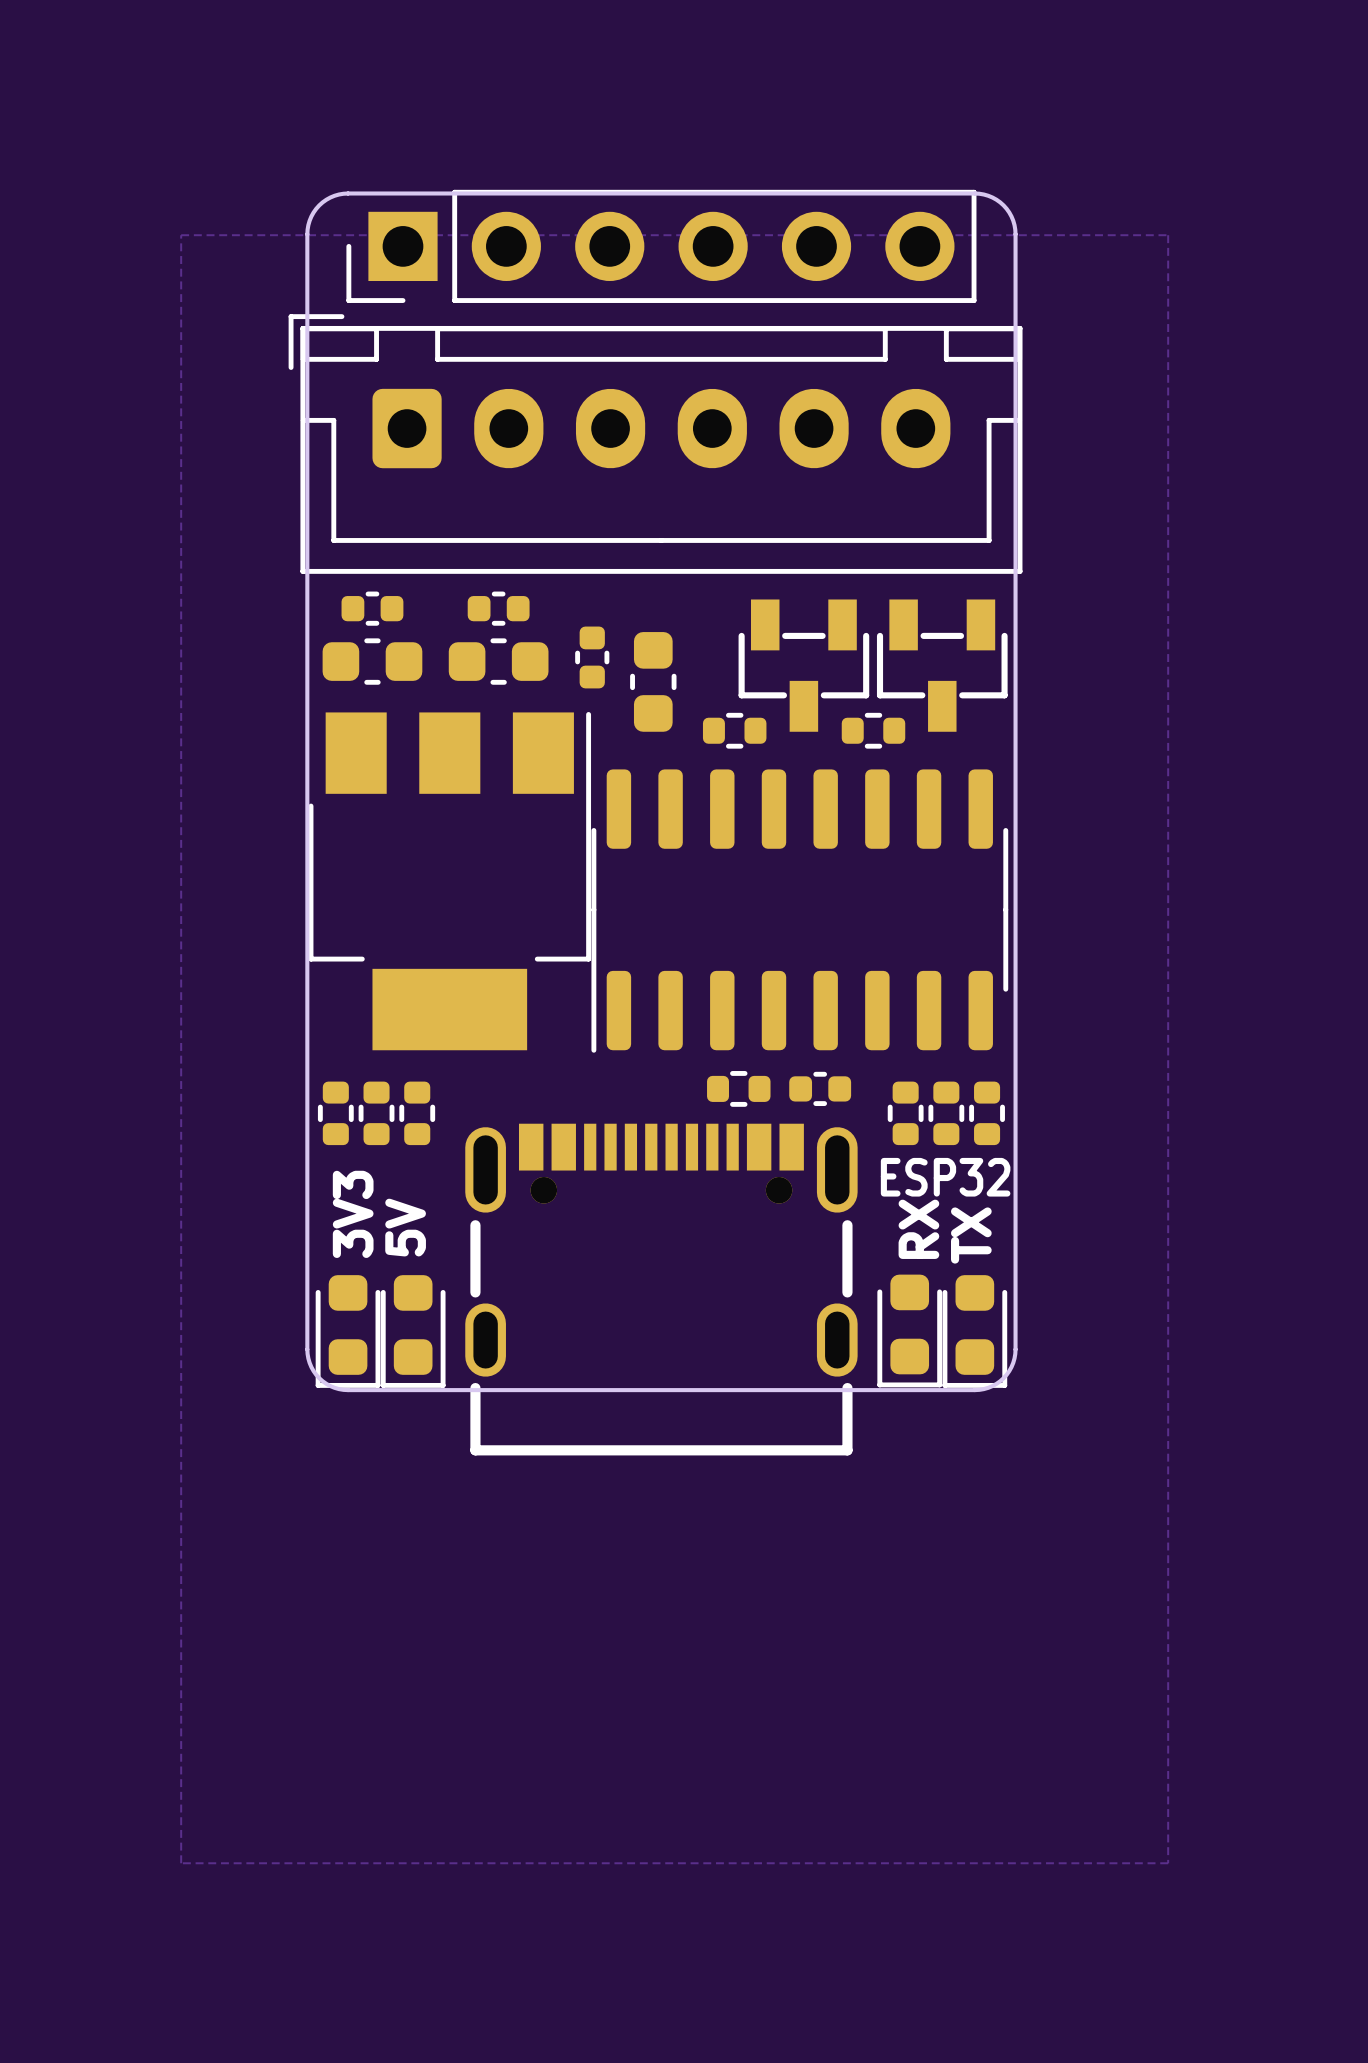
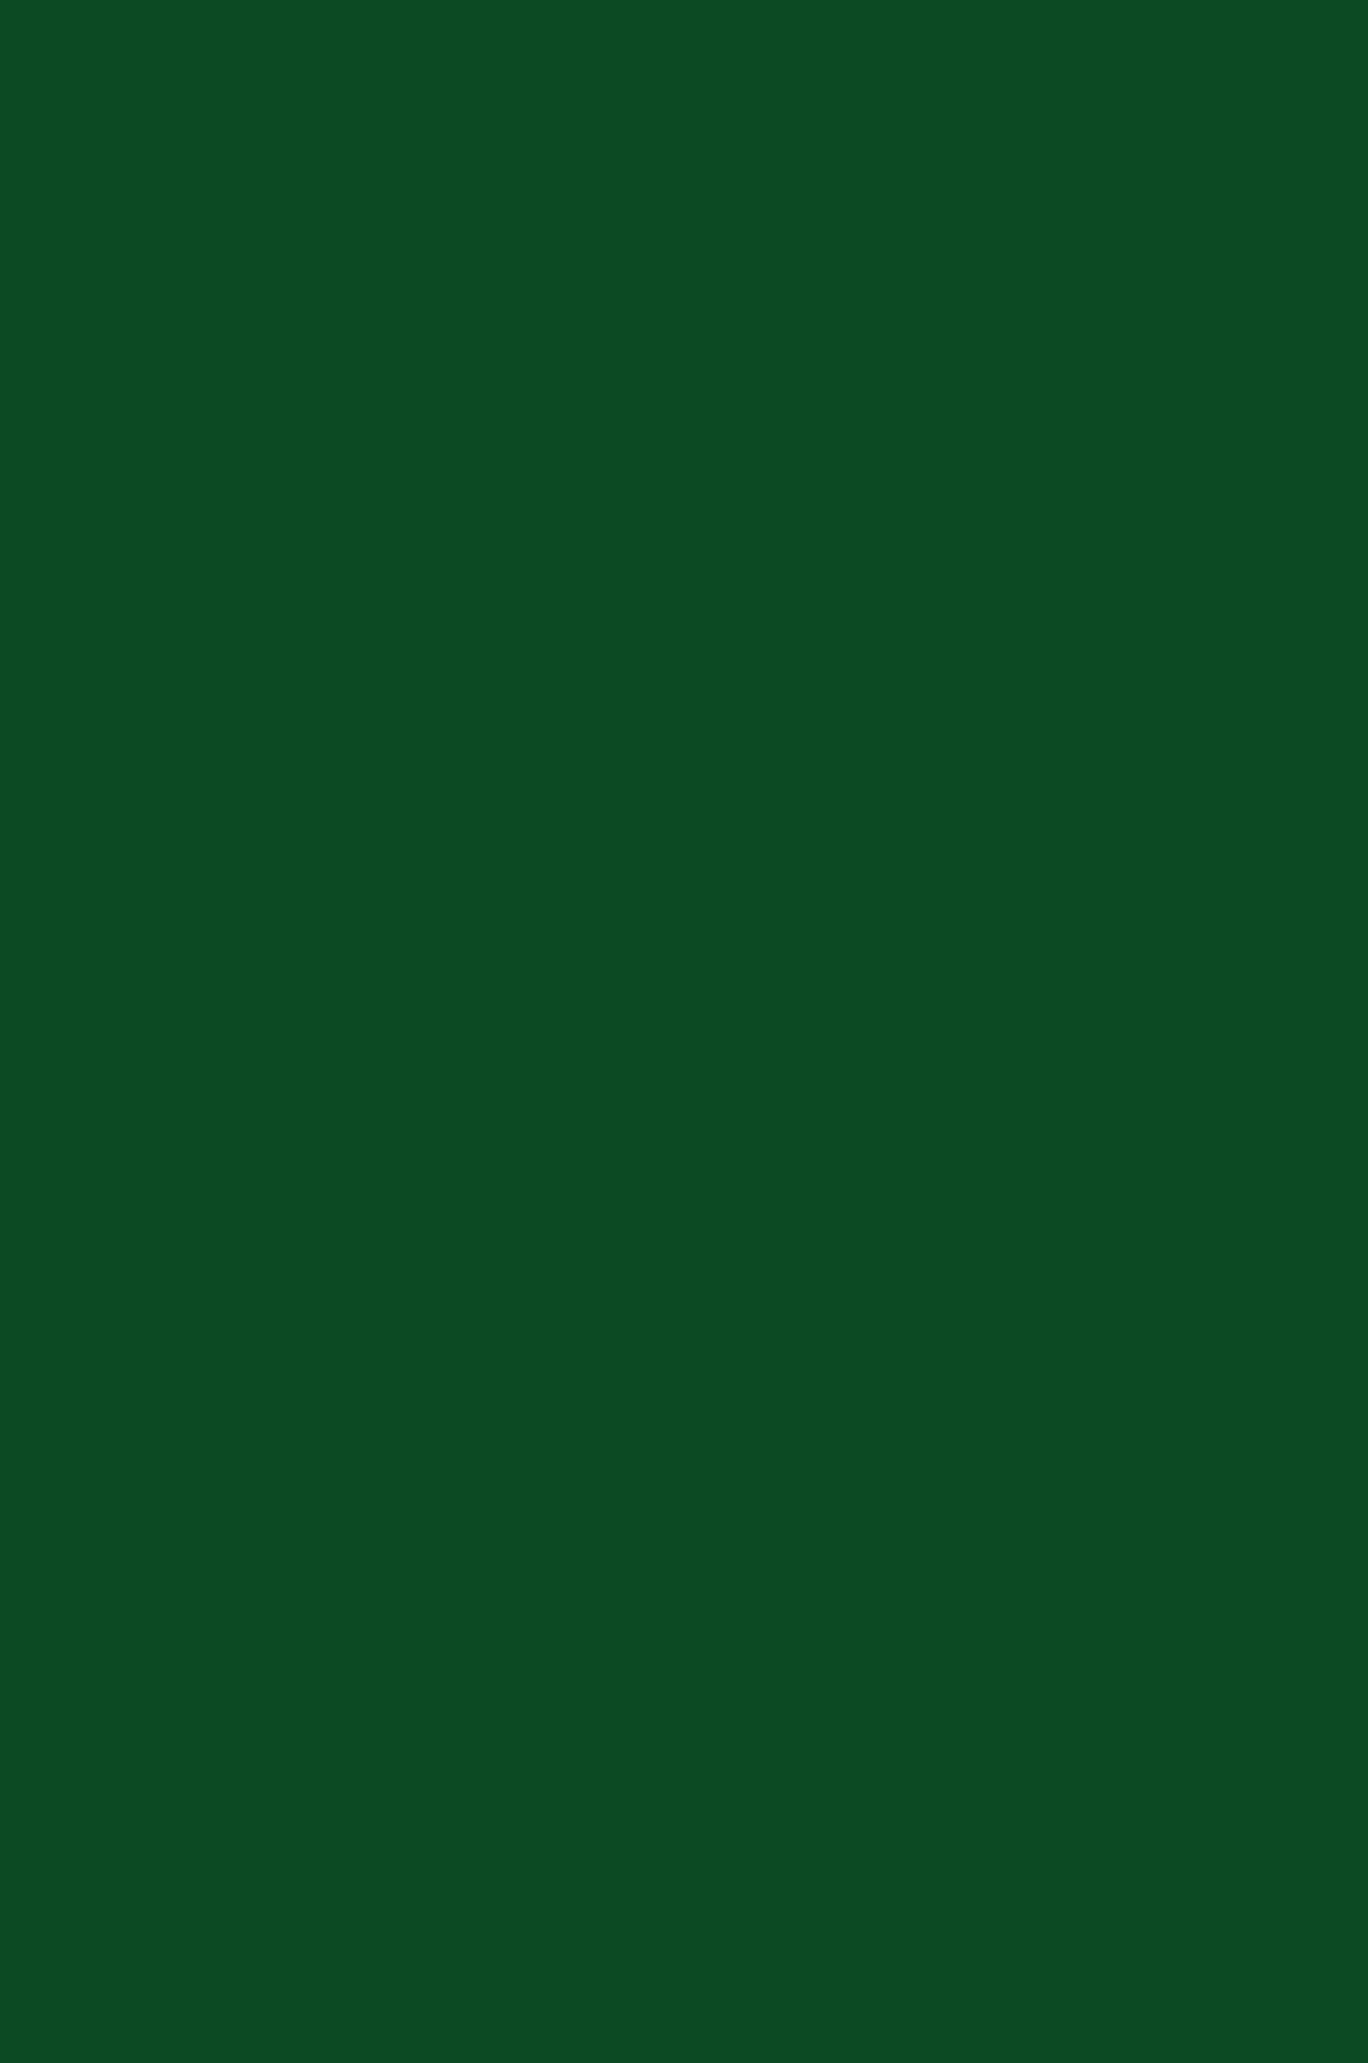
board edge: (348, 193) (974, 193) (983, 194) (996, 199) (1006, 208) (1011, 216) (1015, 234) (1015, 1349) (1013, 1362) (1009, 1371) (1000, 1381) (992, 1386) (974, 1390) (348, 1390) (338, 1389) (326, 1383) (316, 1374) (311, 1367) (307, 1349) (307, 234) (309, 220) (319, 205) (330, 197) (348, 193) -> none
zone outline: (181, 235) (181, 1863) (1168, 1863) (1168, 235) (181, 235) -> none
part: (661, 246) -> none
part: (655, 444) -> none
part: (372, 608) -> none
part: (498, 608) -> none
part: (592, 657) -> none
part: (372, 661) -> none
part: (498, 661) -> none
part: (803, 665) -> none
part: (942, 665) -> none
part: (653, 681) -> none
part: (734, 730) -> none
part: (873, 730) -> none
part: (449, 881) -> none
part: (799, 911) -> none
part: (738, 1088) -> none
part: (820, 1088) -> none
part: (335, 1113) -> none
part: (376, 1113) -> none
part: (417, 1113) -> none
part: (905, 1113) -> none
part: (946, 1113) -> none
part: (987, 1113) -> none
text: ESP32 (945, 1177) -> none
text: 3V3 (353, 1214) -> none
text: 5V (405, 1227) -> none
text: RX (918, 1229) -> none
text: TX (971, 1235) -> none
part: (661, 1289) -> none
part: (909, 1330) -> none
part: (348, 1331) -> none
part: (413, 1331) -> none
part: (974, 1331) -> none

